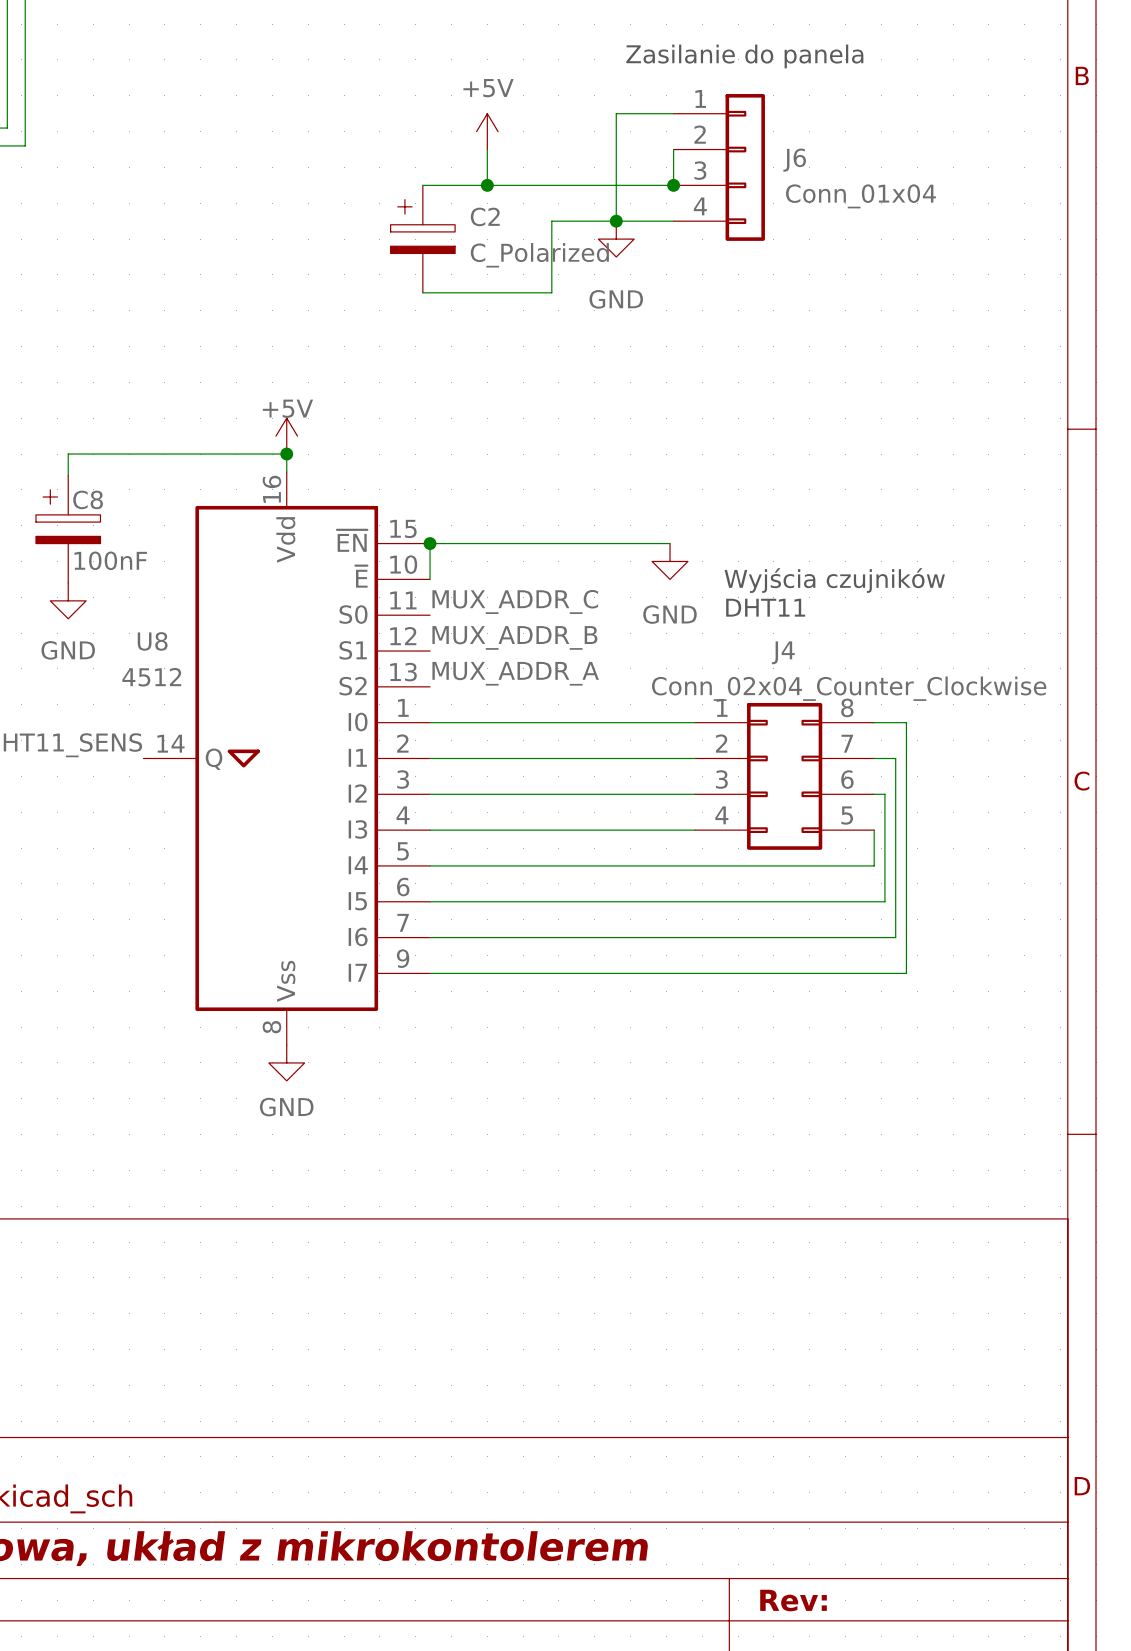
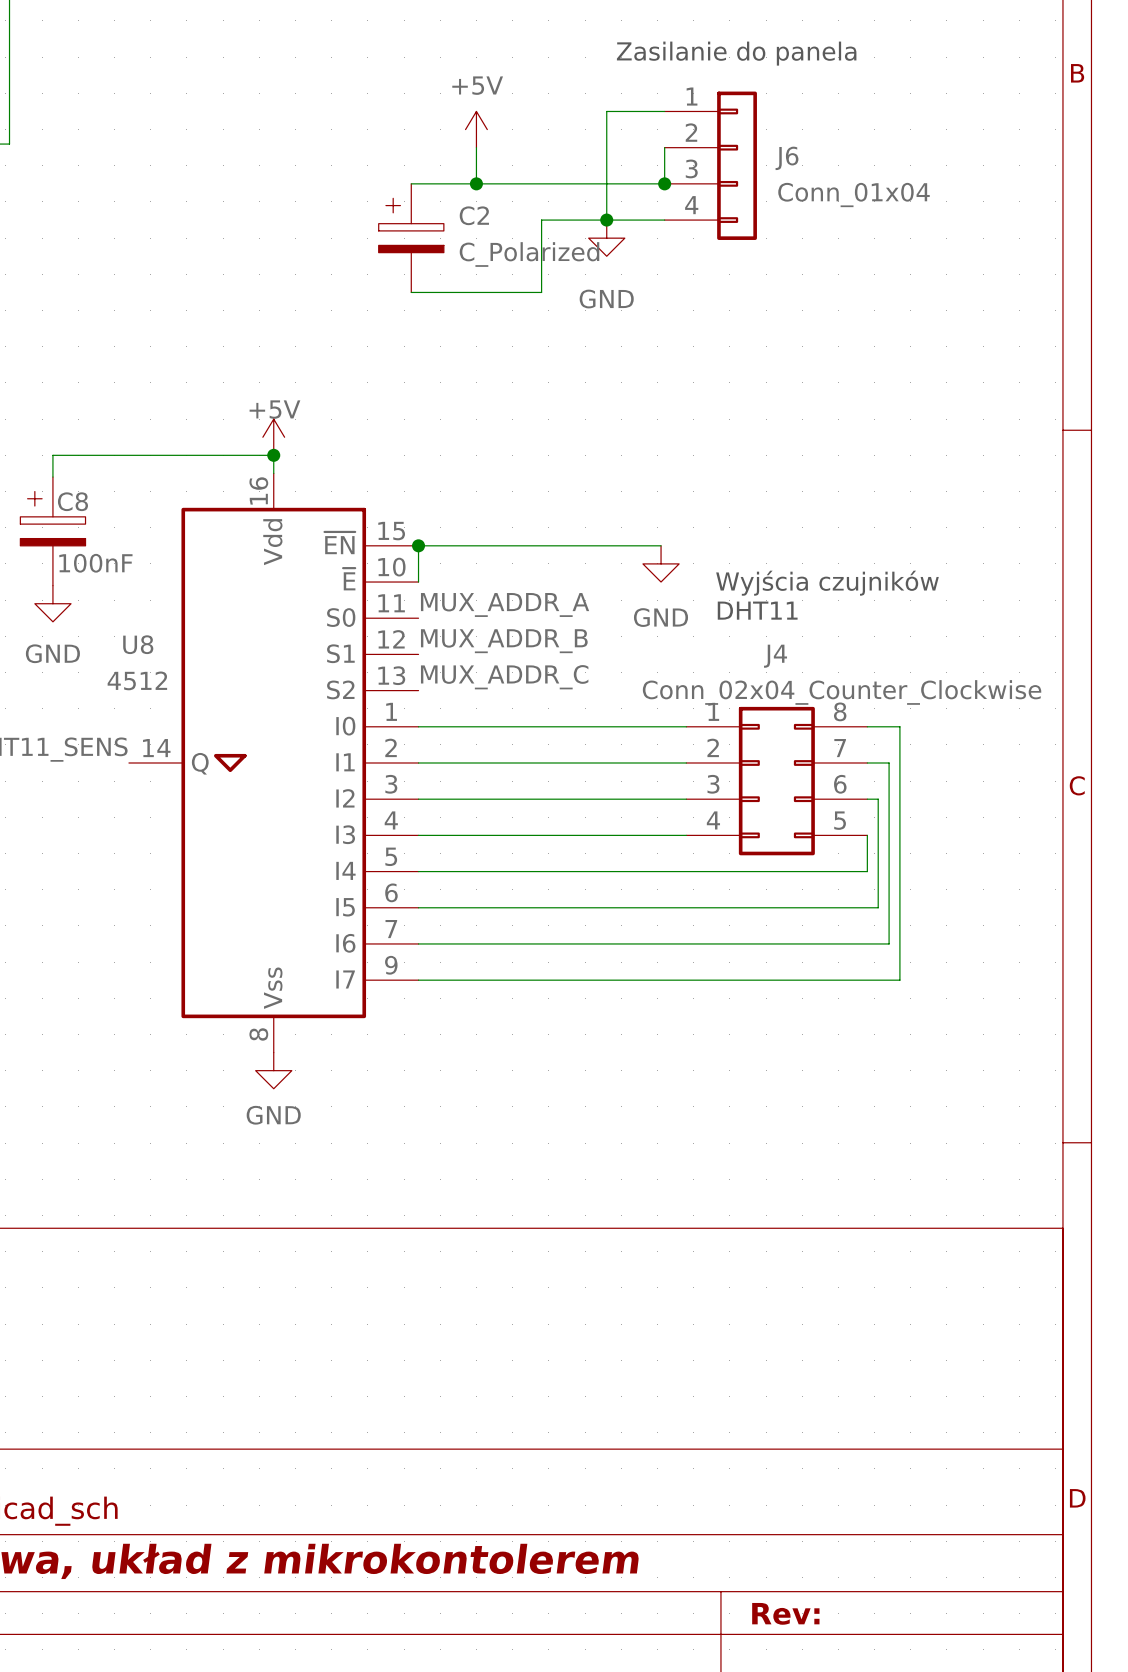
label: MUX_ADDR_C (515, 601) -> MUX_ADDR_A (505, 604)
label: MUX_ADDR_A (515, 673) -> MUX_ADDR_C (504, 677)

